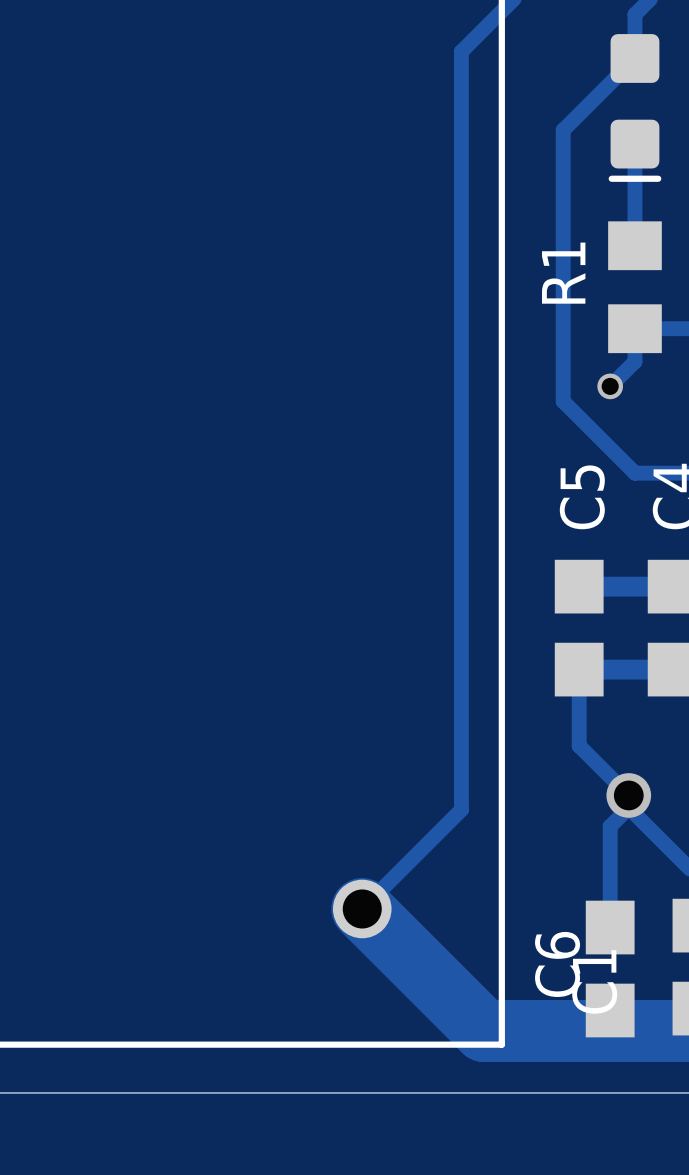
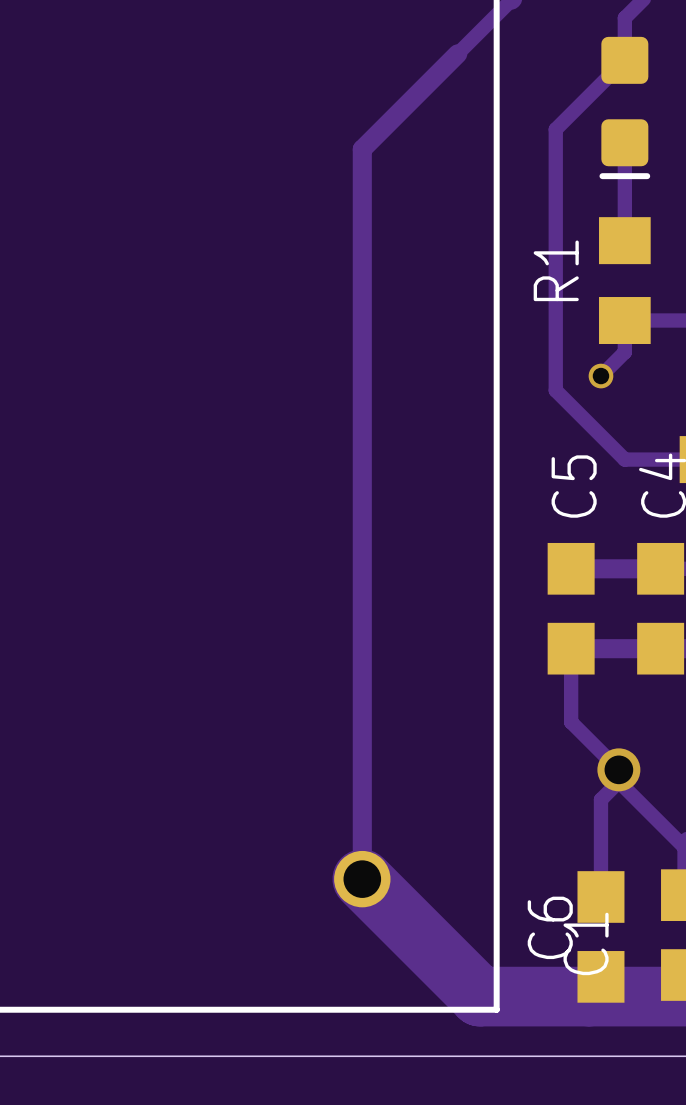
track: (461, 51) (461, 809) (362, 908) -> (457, 53) (362, 149) (362, 879)

